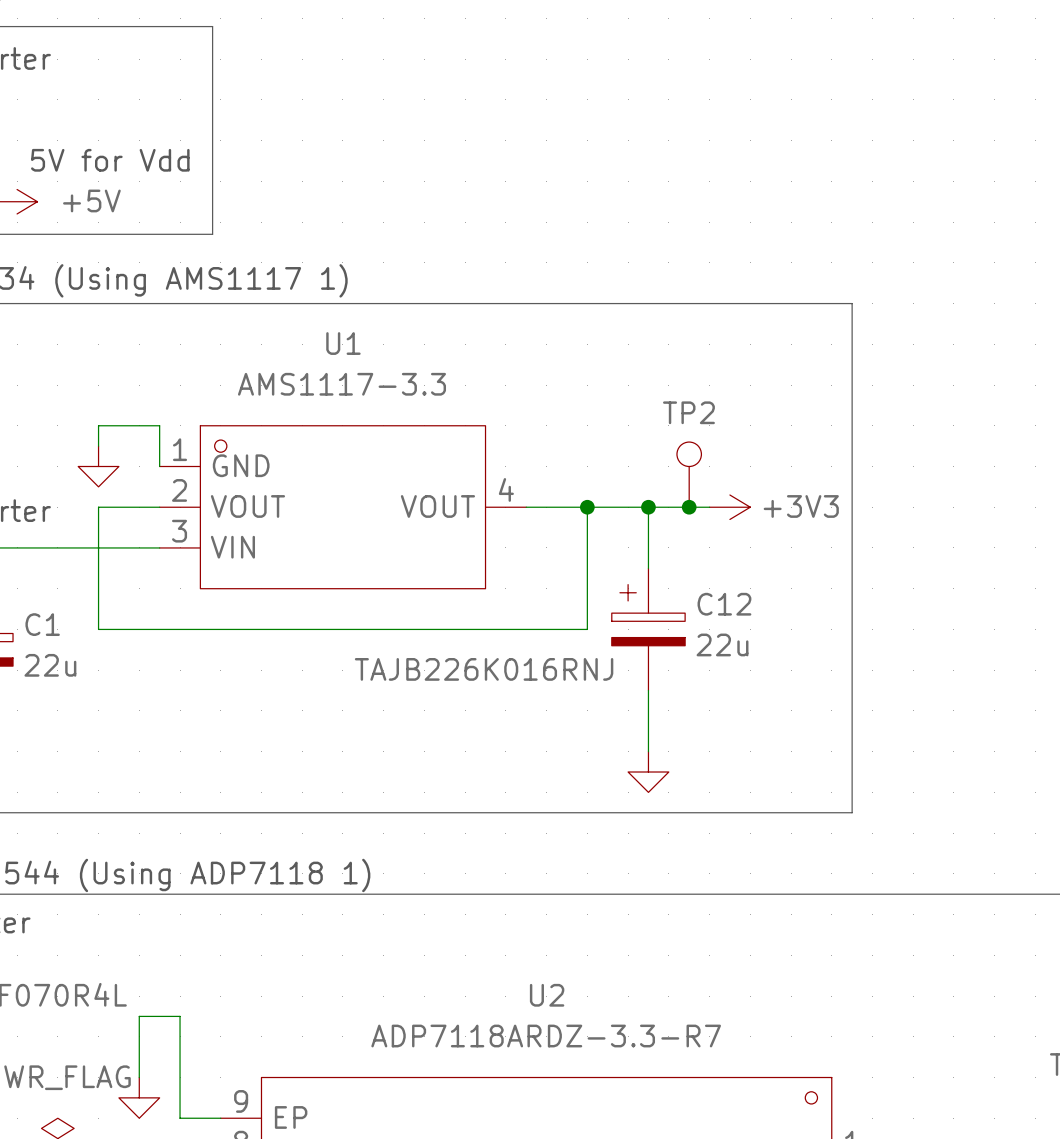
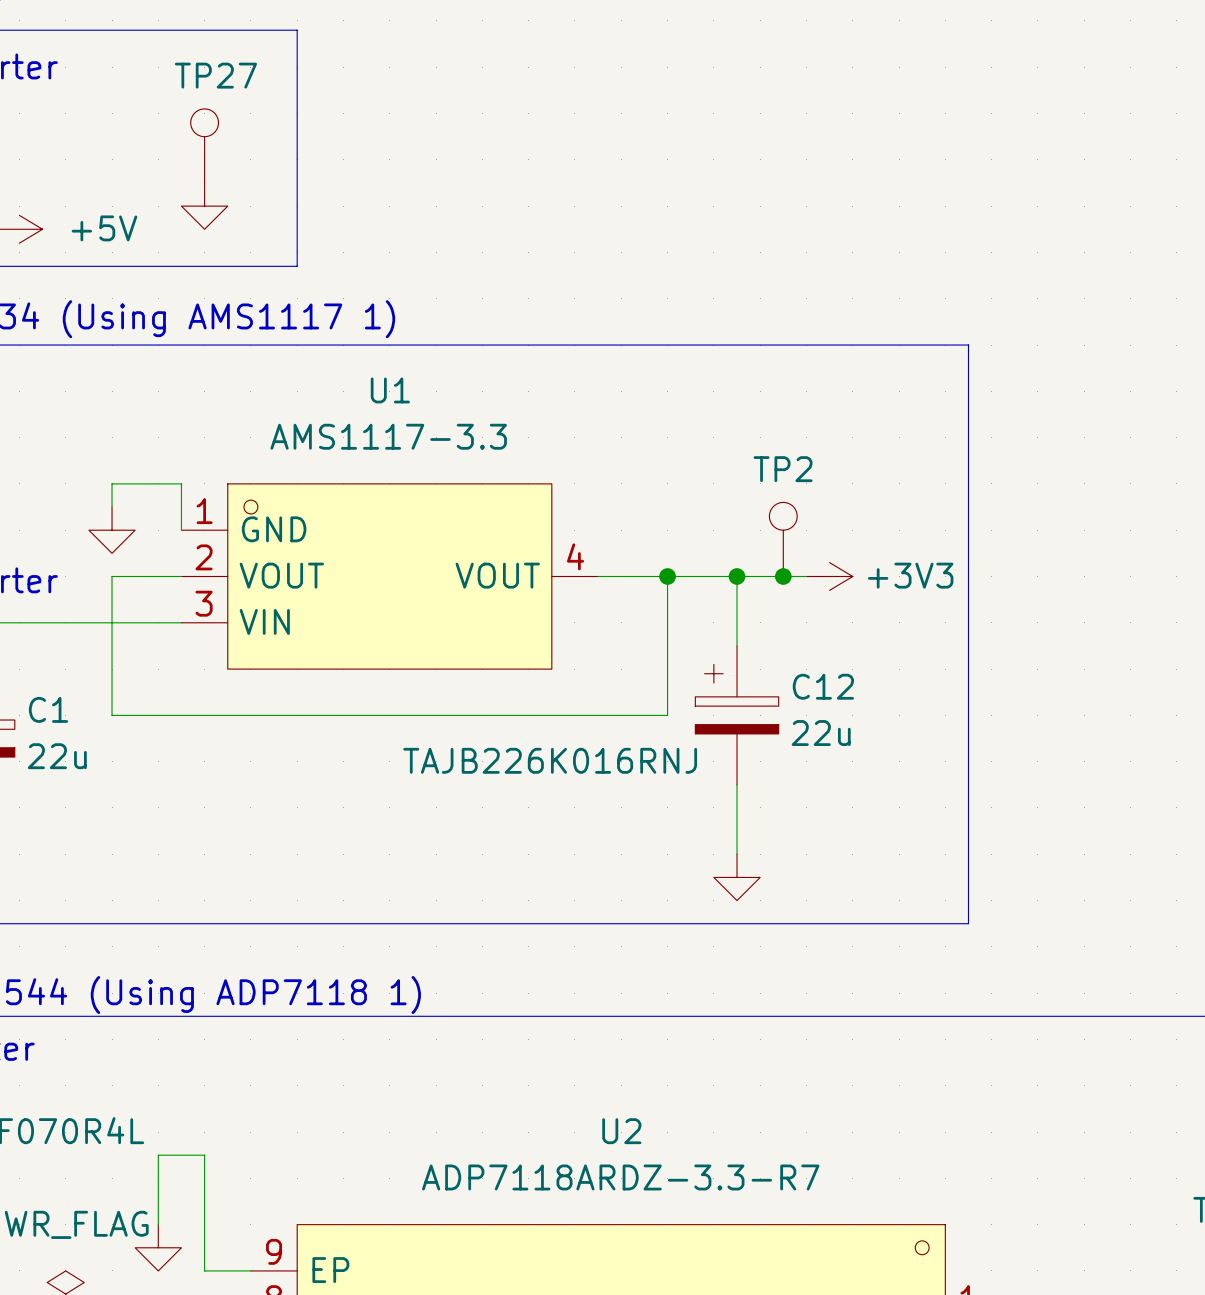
line: (212, 26) (212, 234) -> (241, 30) (297, 30) (297, 266) (241, 266)
TP27: none -> (204, 145)
text: 5V for Vdd (110, 160) -> none
power symbol: none -> (204, 206)

